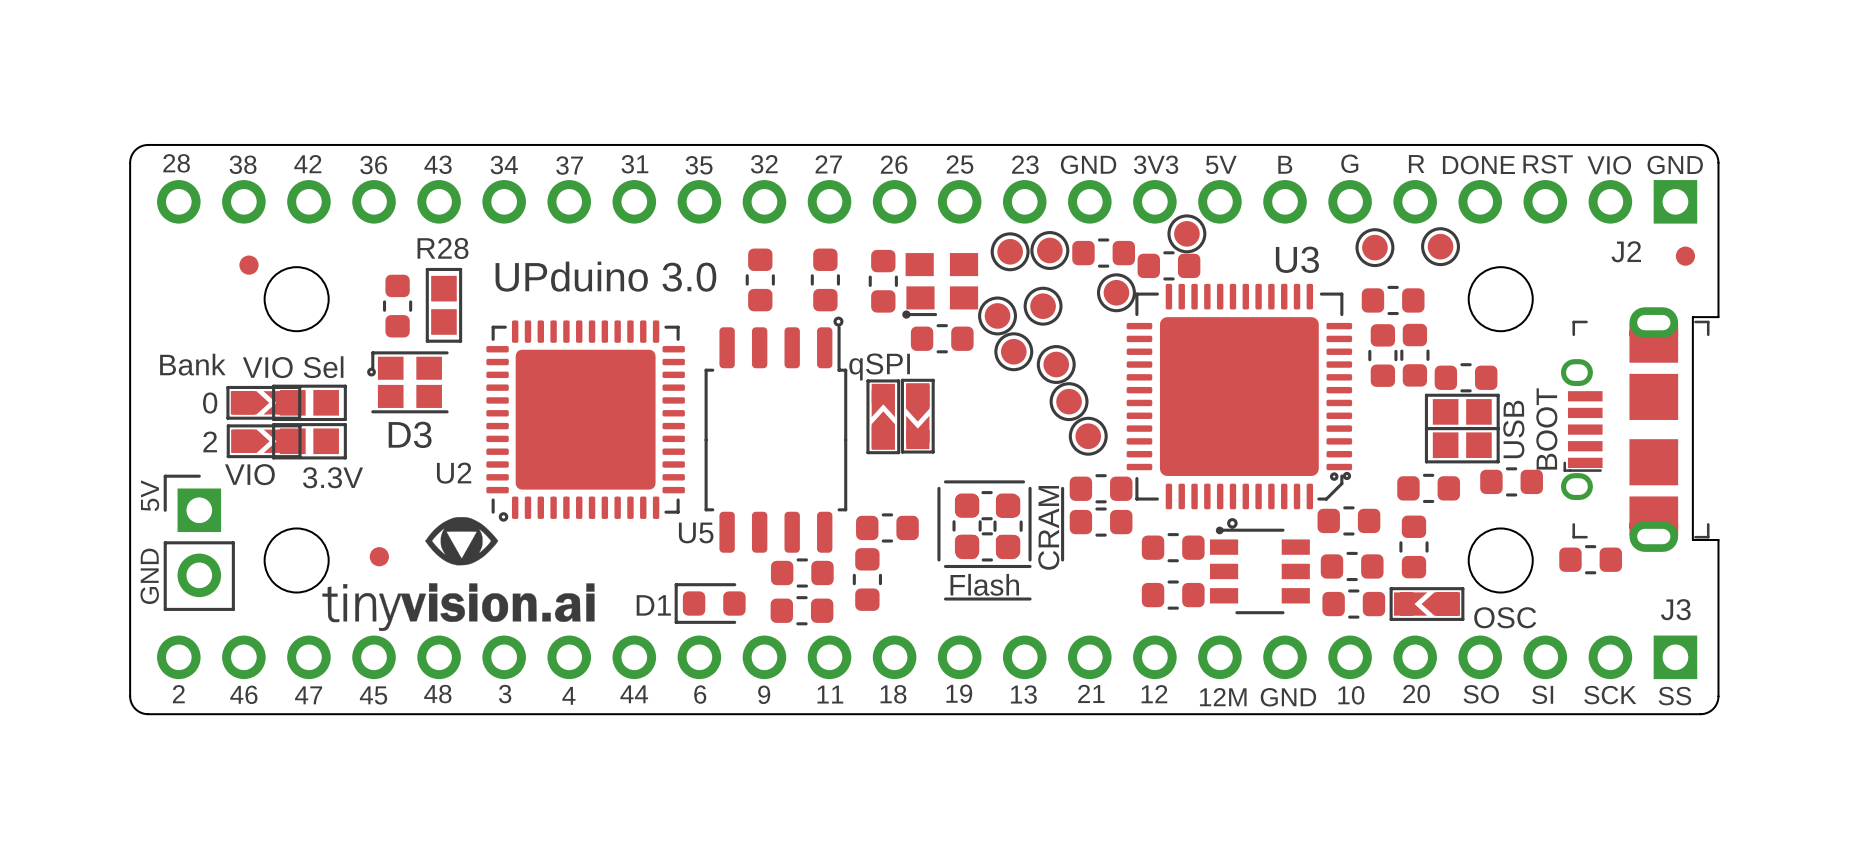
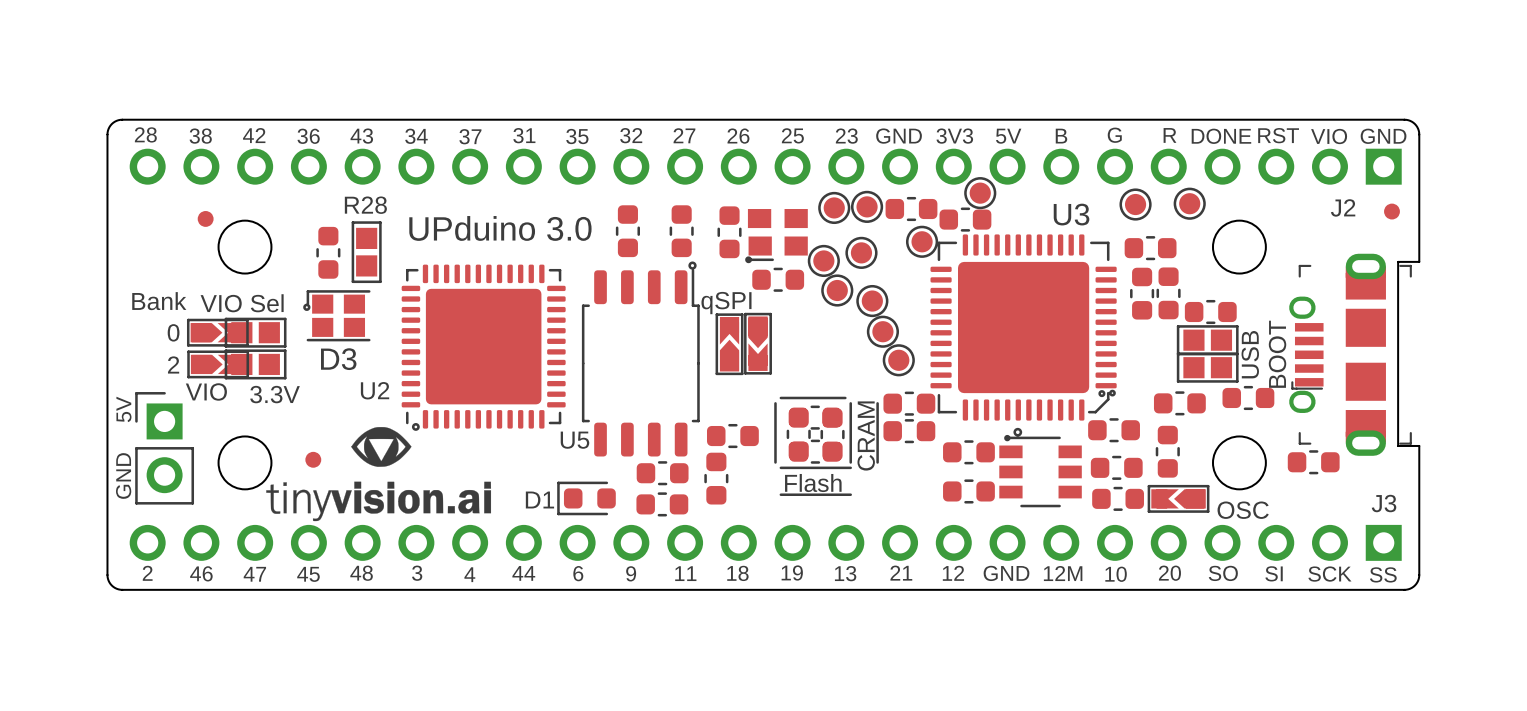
text: 12M (1223, 697) -> GND (1006, 573)
text: GND (1288, 697) -> 12M (1063, 573)

